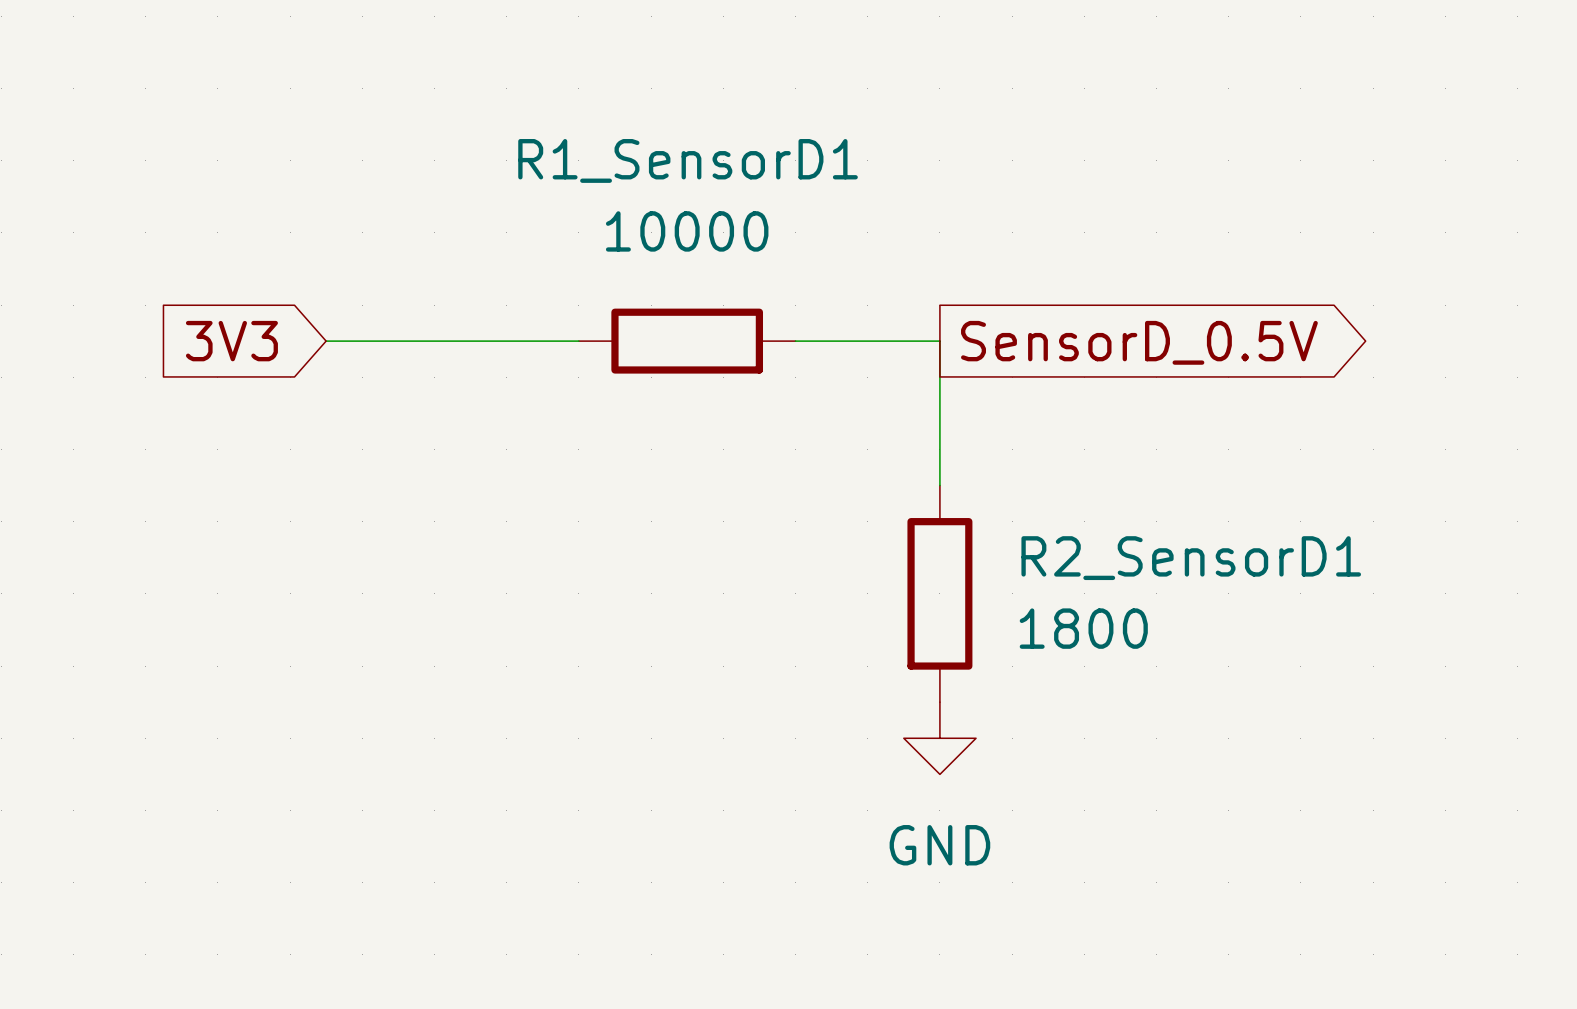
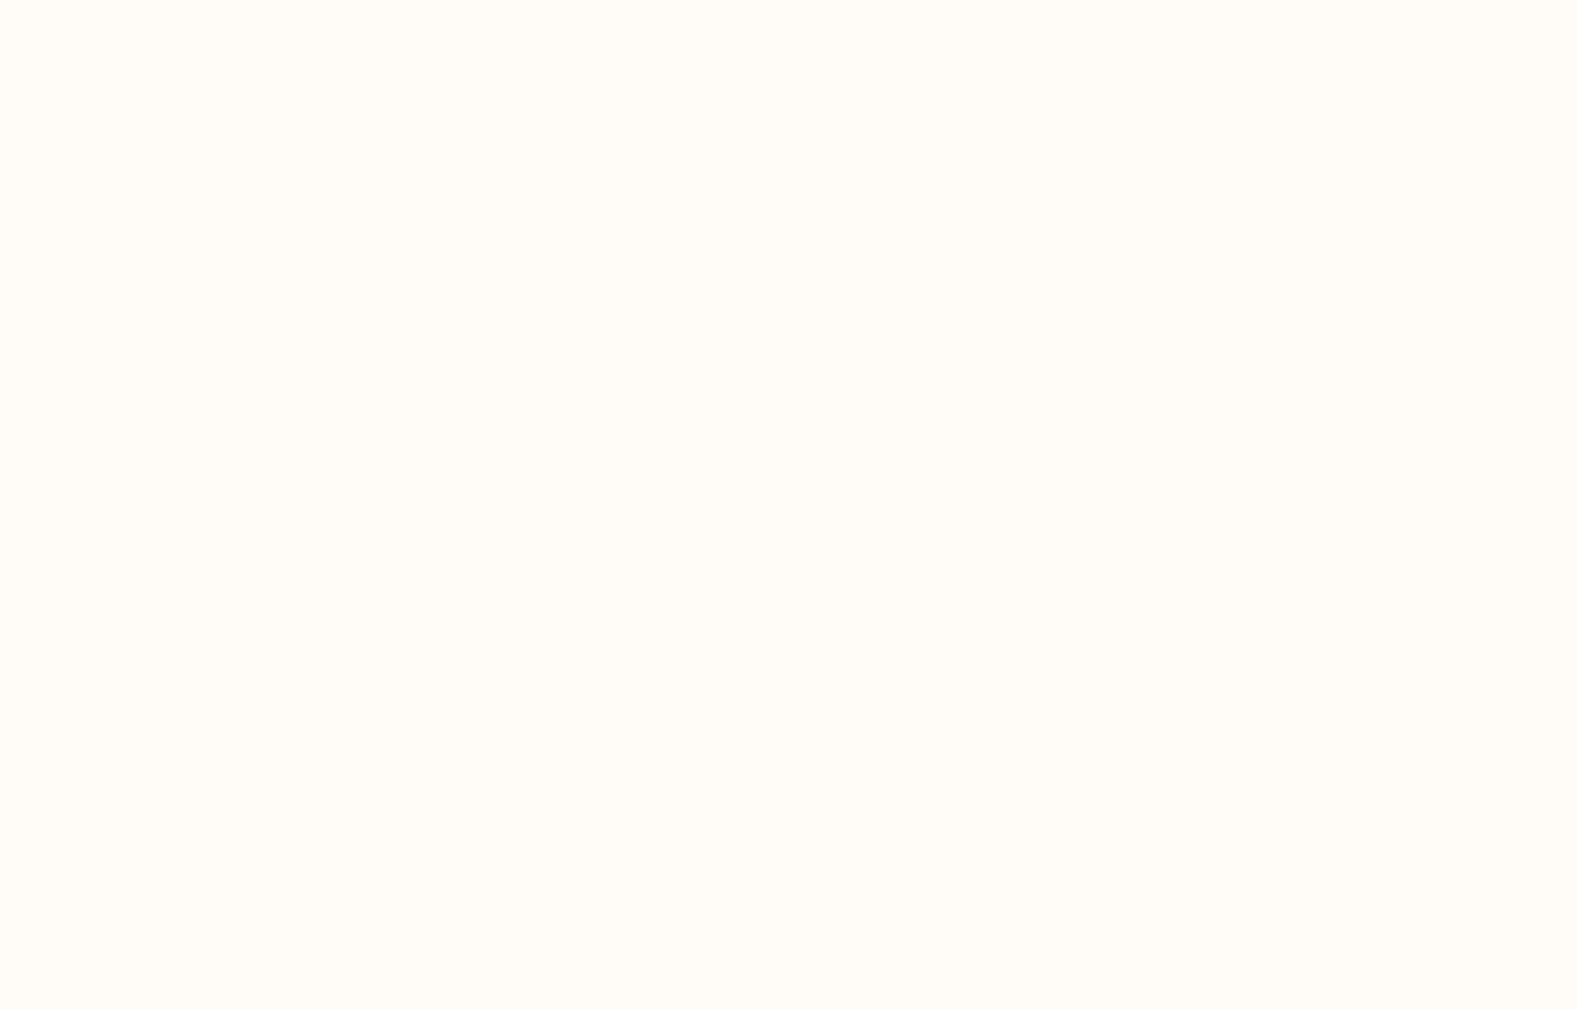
global label: 3V3 (231, 341) -> none
wire: (326, 341) (578, 341) -> none
R1_SensorD1: 10000 (687, 341) -> none
wire: (795, 341) (939, 341) (939, 485) -> none
global label: SensorD_0.5V (1139, 342) -> none
R2_SensorD1: 1800 (939, 593) -> none
power symbol: GND (939, 738) -> none

